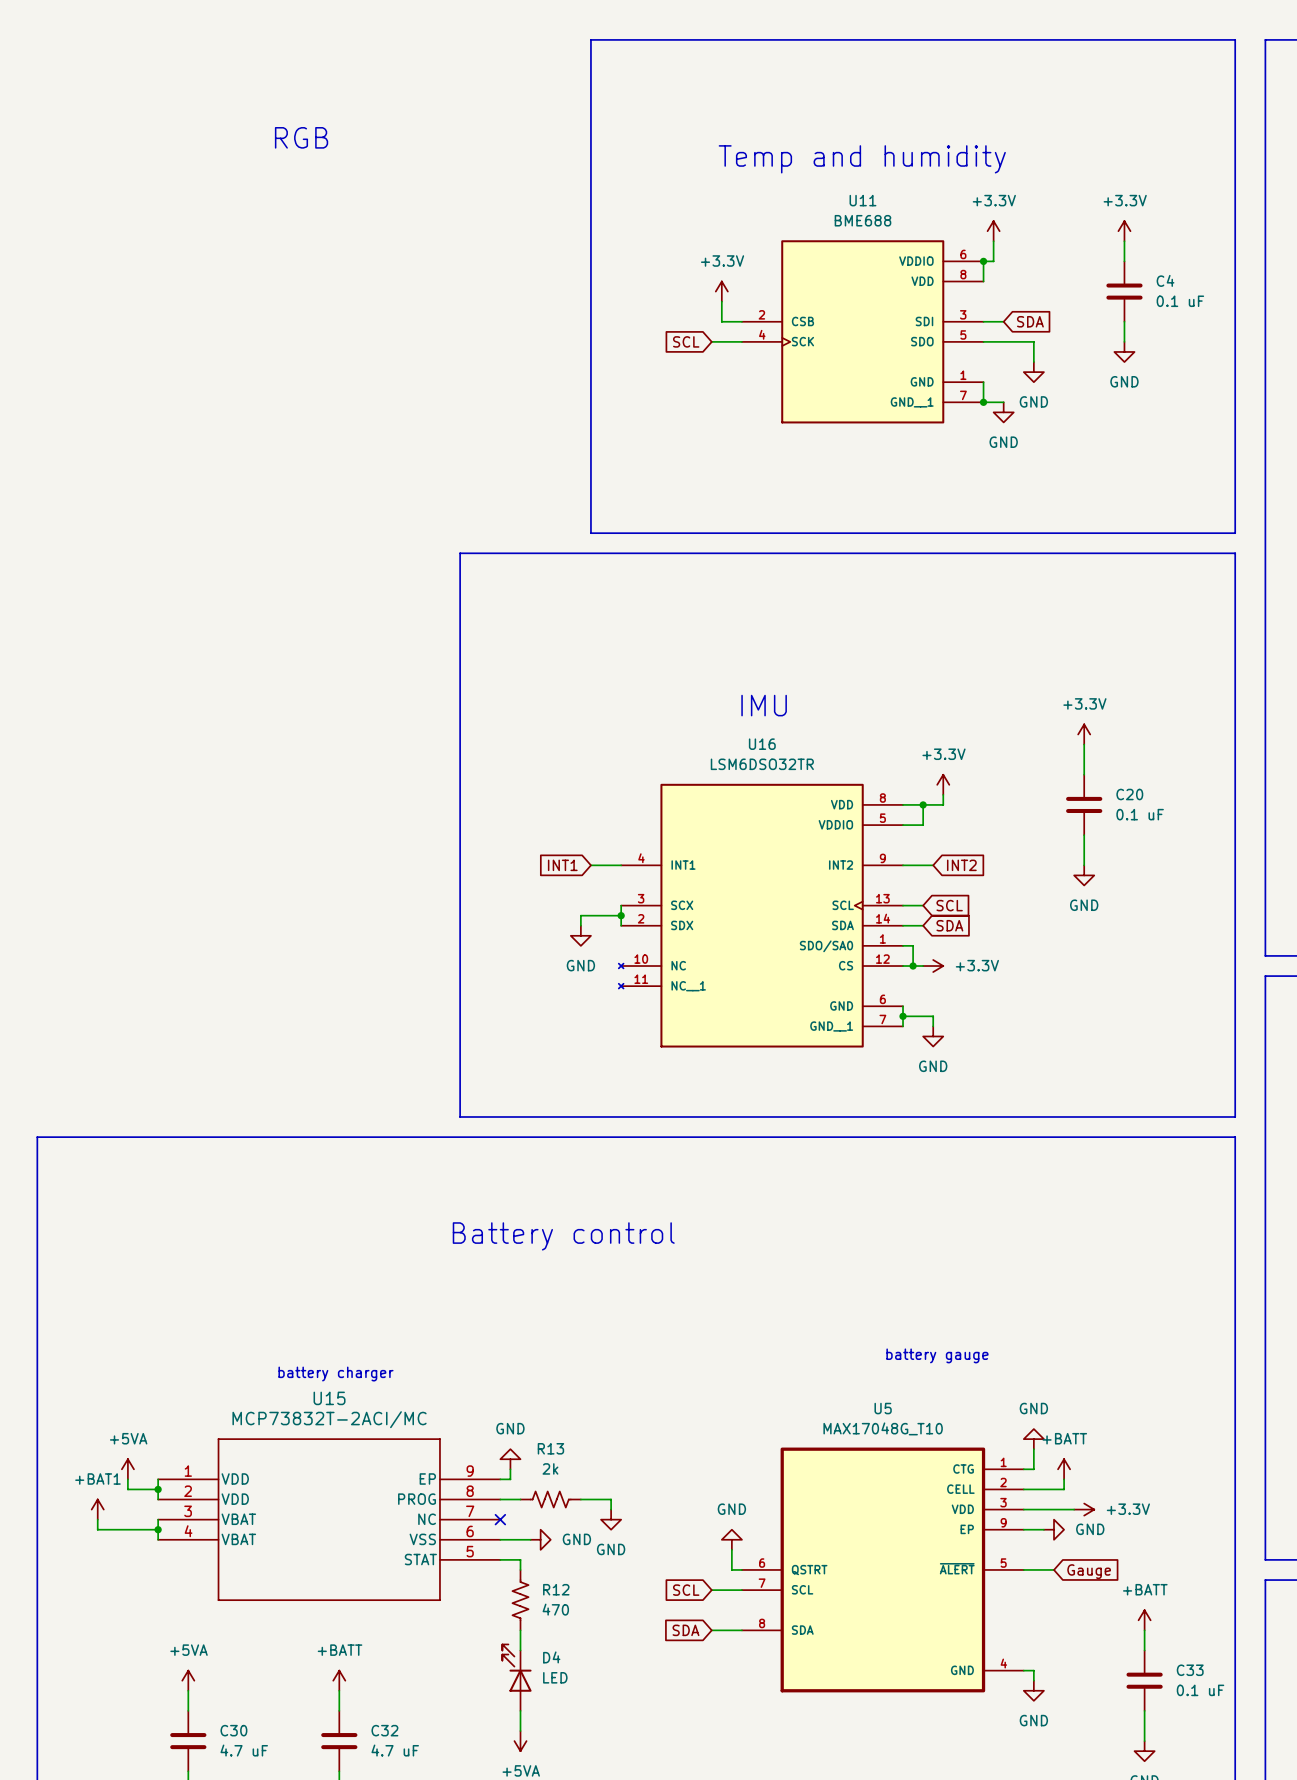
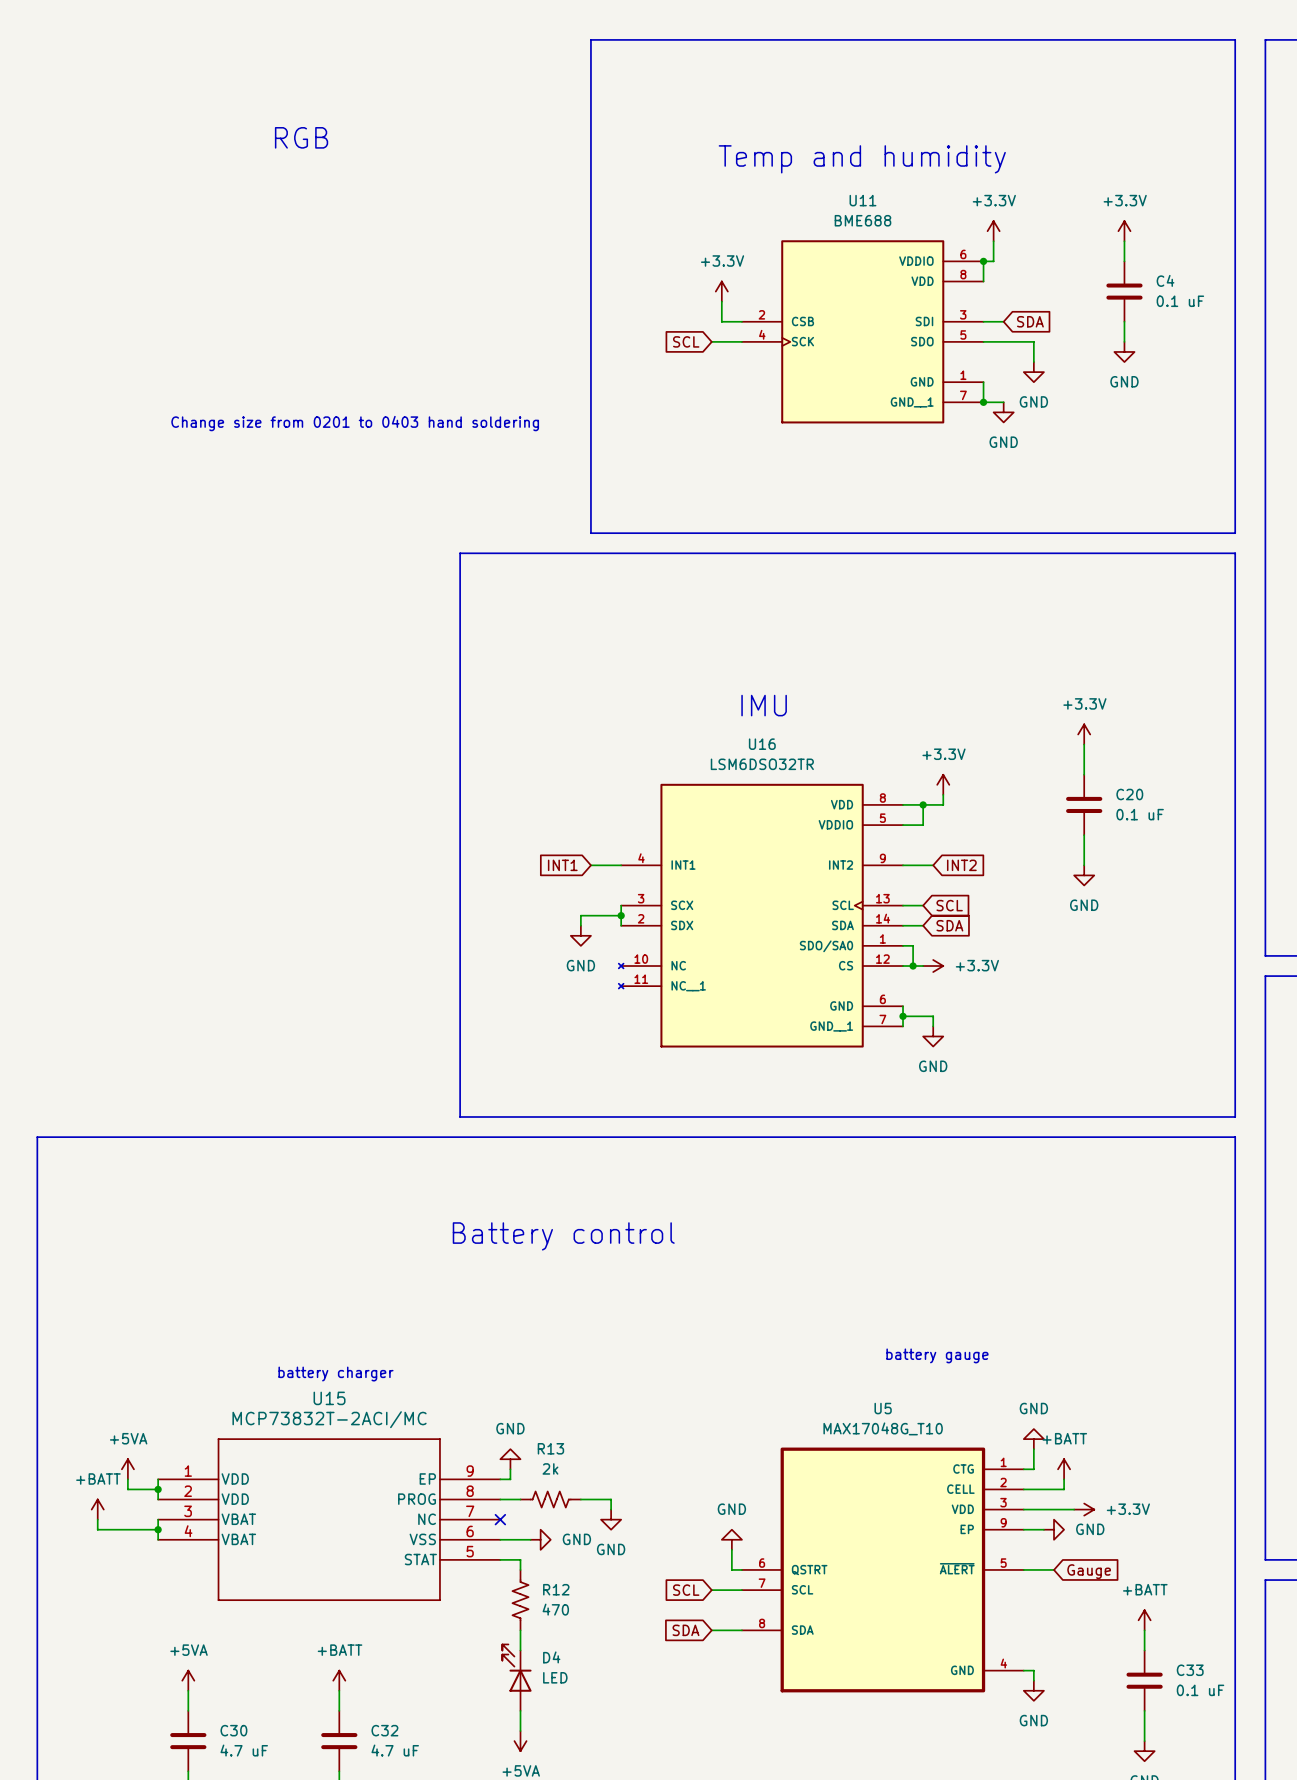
text: none -> Change size from 0201 to 0403 hand soldering (355, 423)
power symbol: +BAT1 (97, 1509) -> +BATT (97, 1509)

